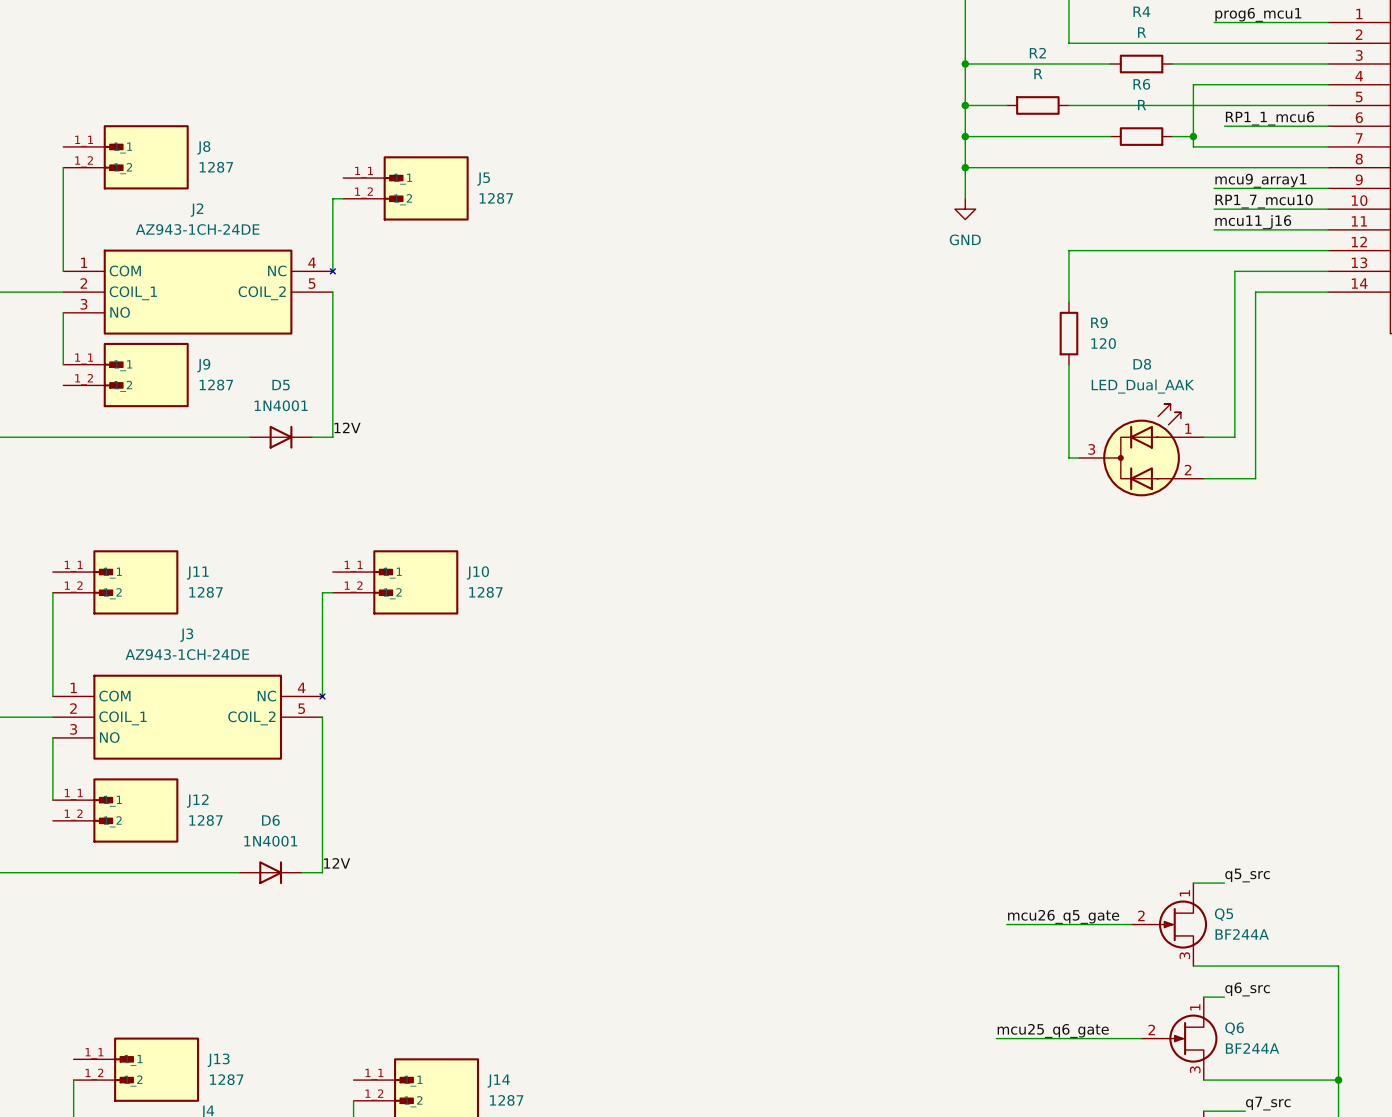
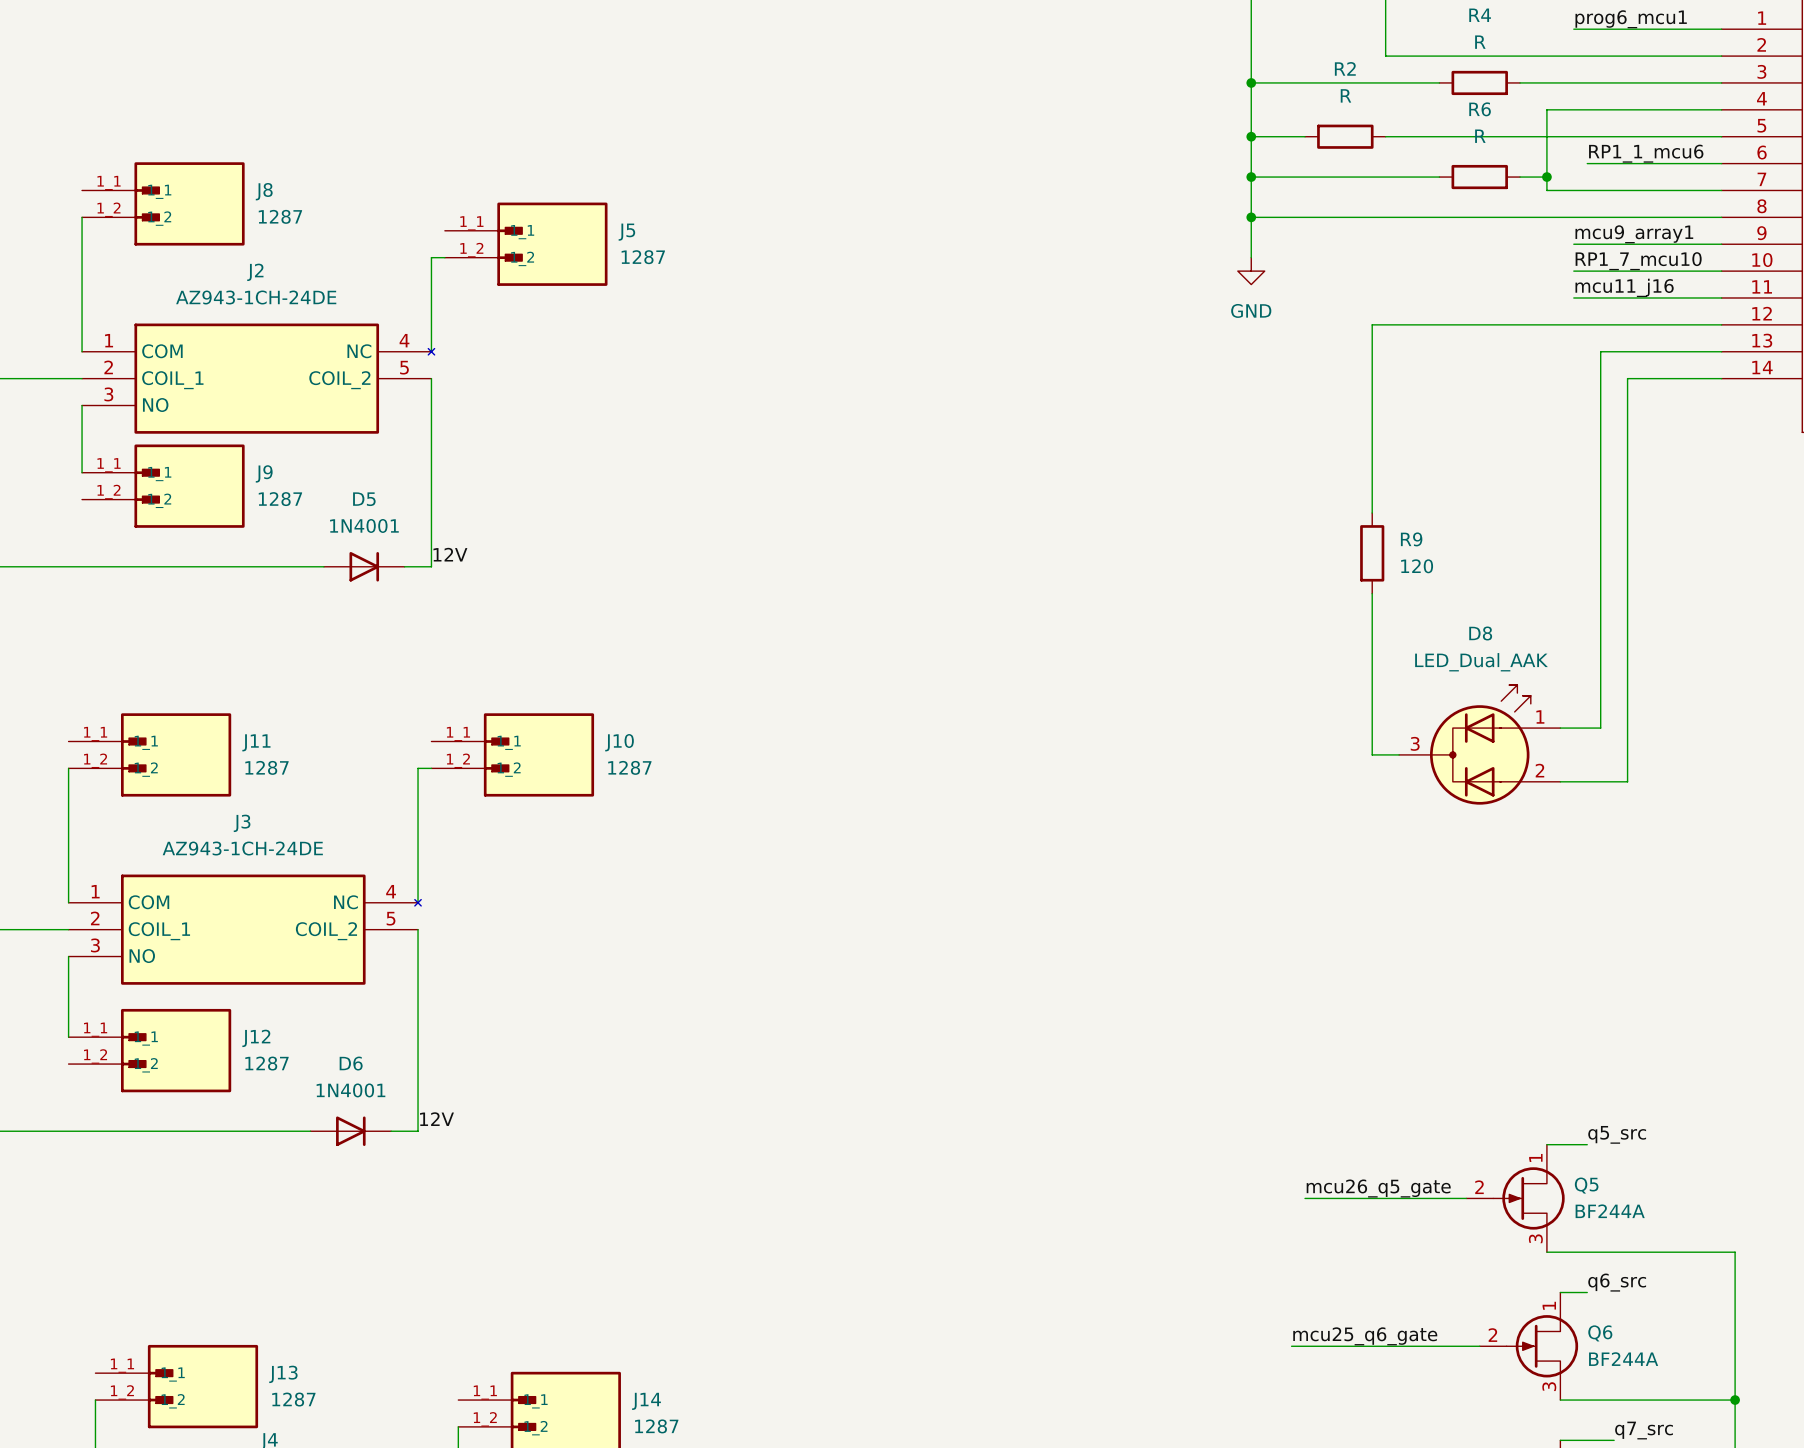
wire: (1068, 250) (1068, 302) -> (1385, 324) (1372, 324) (1372, 513)
R9 position: (1068, 333) -> (1372, 553)
wire: (1068, 364) (1068, 457) (1079, 457) -> none
wire: (1203, 437) (1234, 437) -> (1560, 728) (1600, 728) (1600, 566)
D8 position: (1141, 450) -> (1479, 744)
wire: none -> (1372, 593) (1372, 754) (1399, 754)
wire: (1203, 478) (1255, 478) -> (1560, 781) (1627, 781) (1627, 620)

